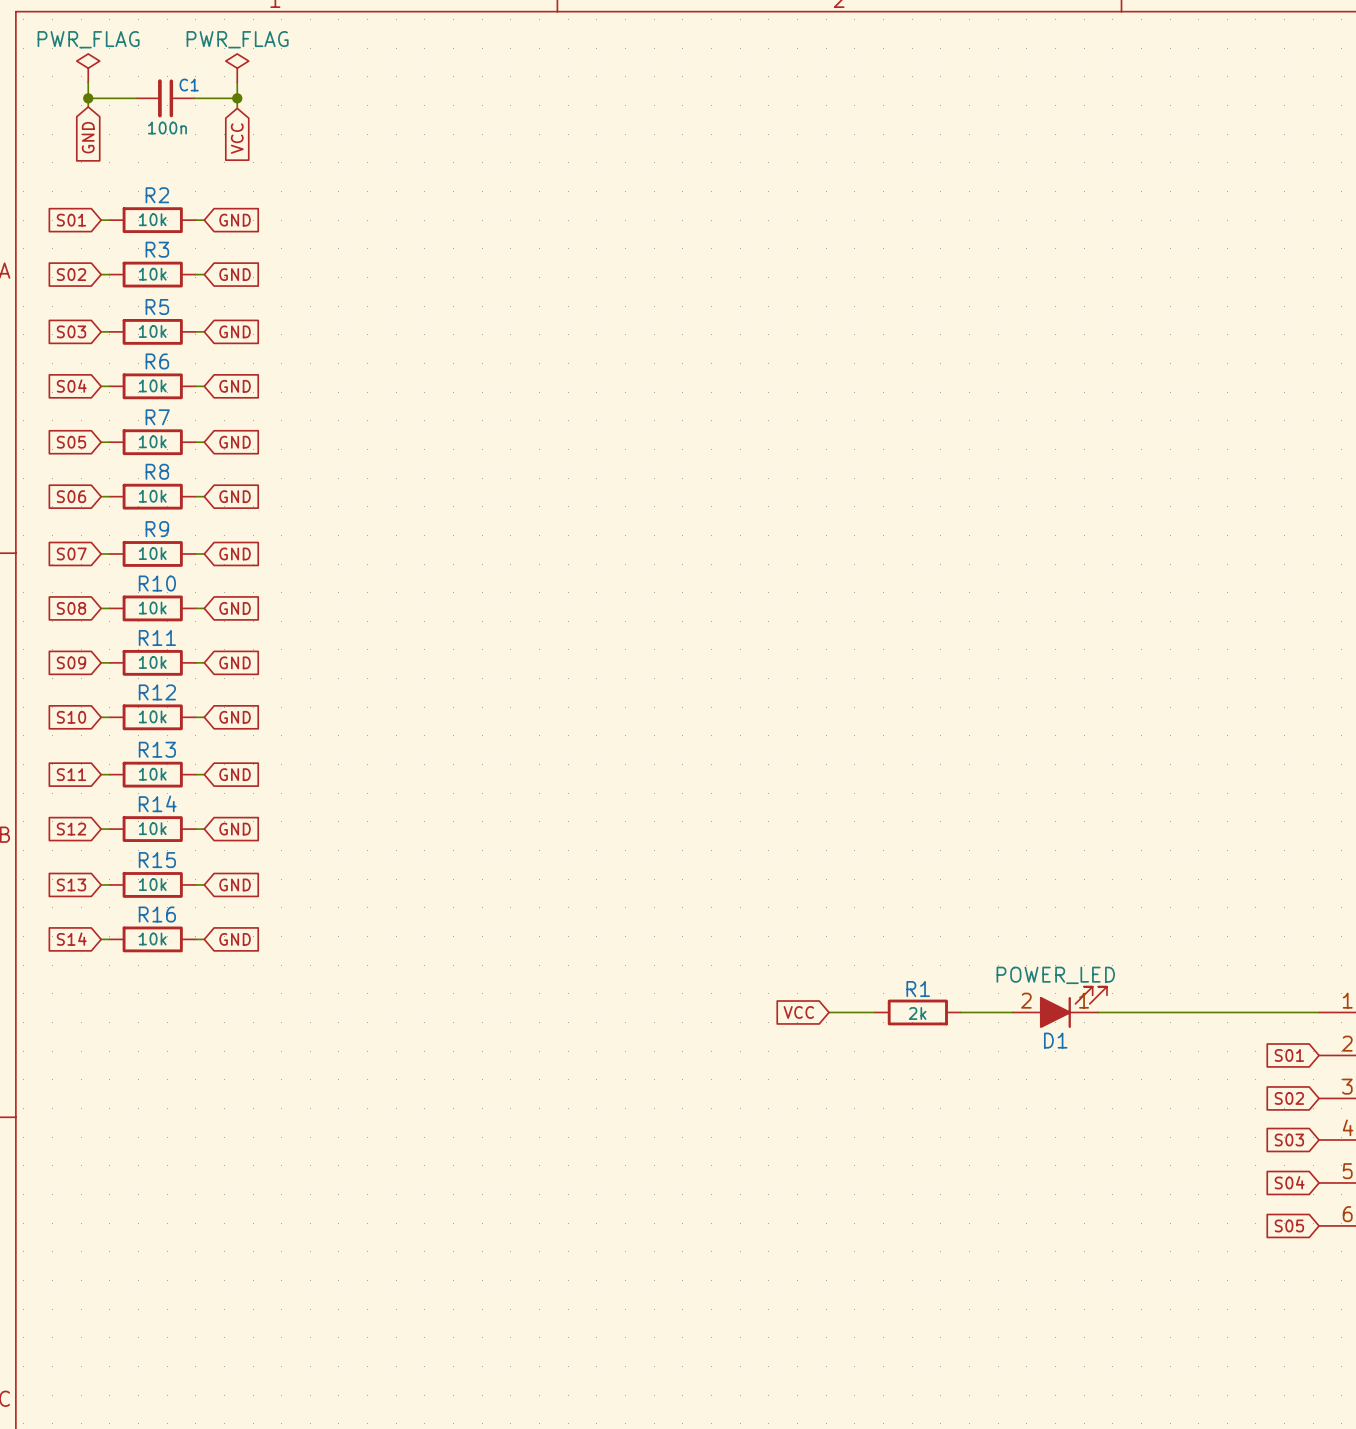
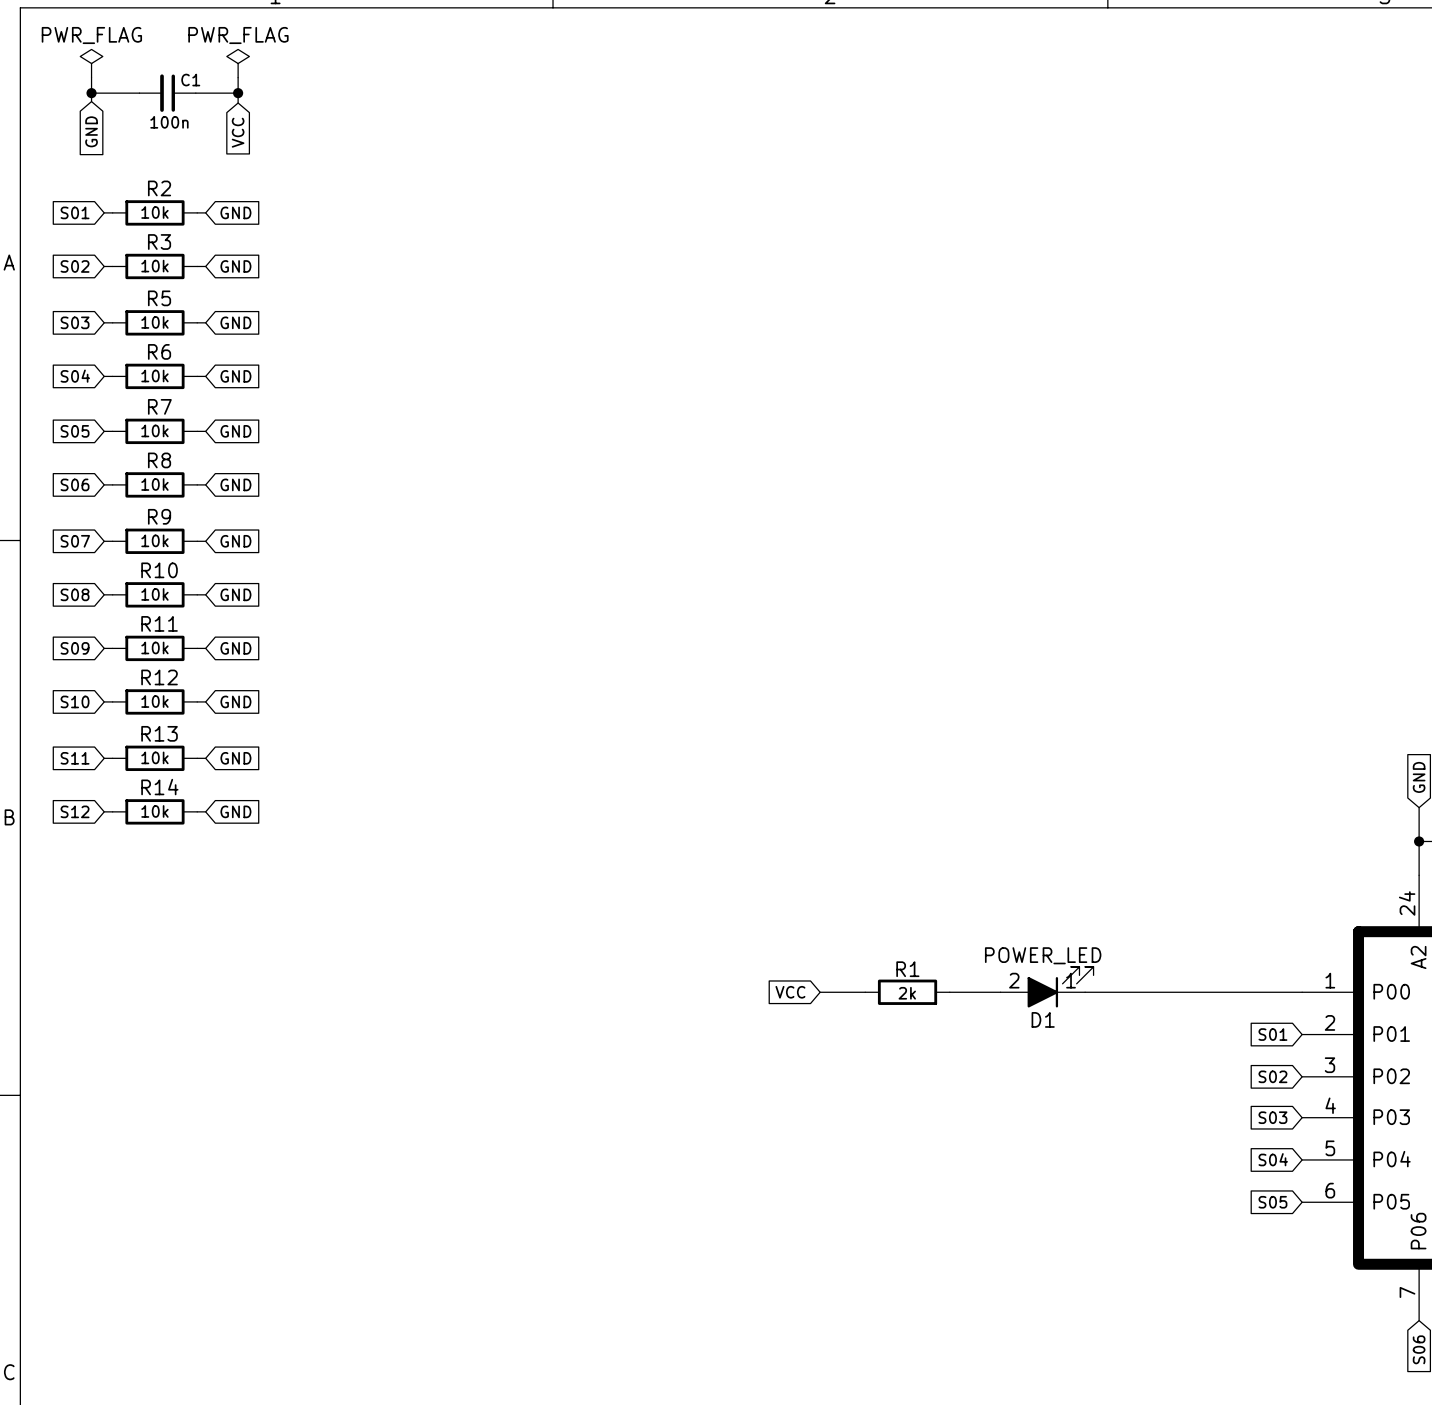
global label: S13 (71, 884) -> none
wire: (101, 884) (109, 884) -> none
R15: 10k (152, 884) -> none
wire: (195, 884) (204, 884) -> none
global label: GND (235, 884) -> none
global label: S14 (71, 939) -> none
wire: (101, 939) (109, 939) -> none
R16: 10k (152, 939) -> none
wire: (195, 939) (204, 939) -> none
global label: GND (235, 939) -> none

